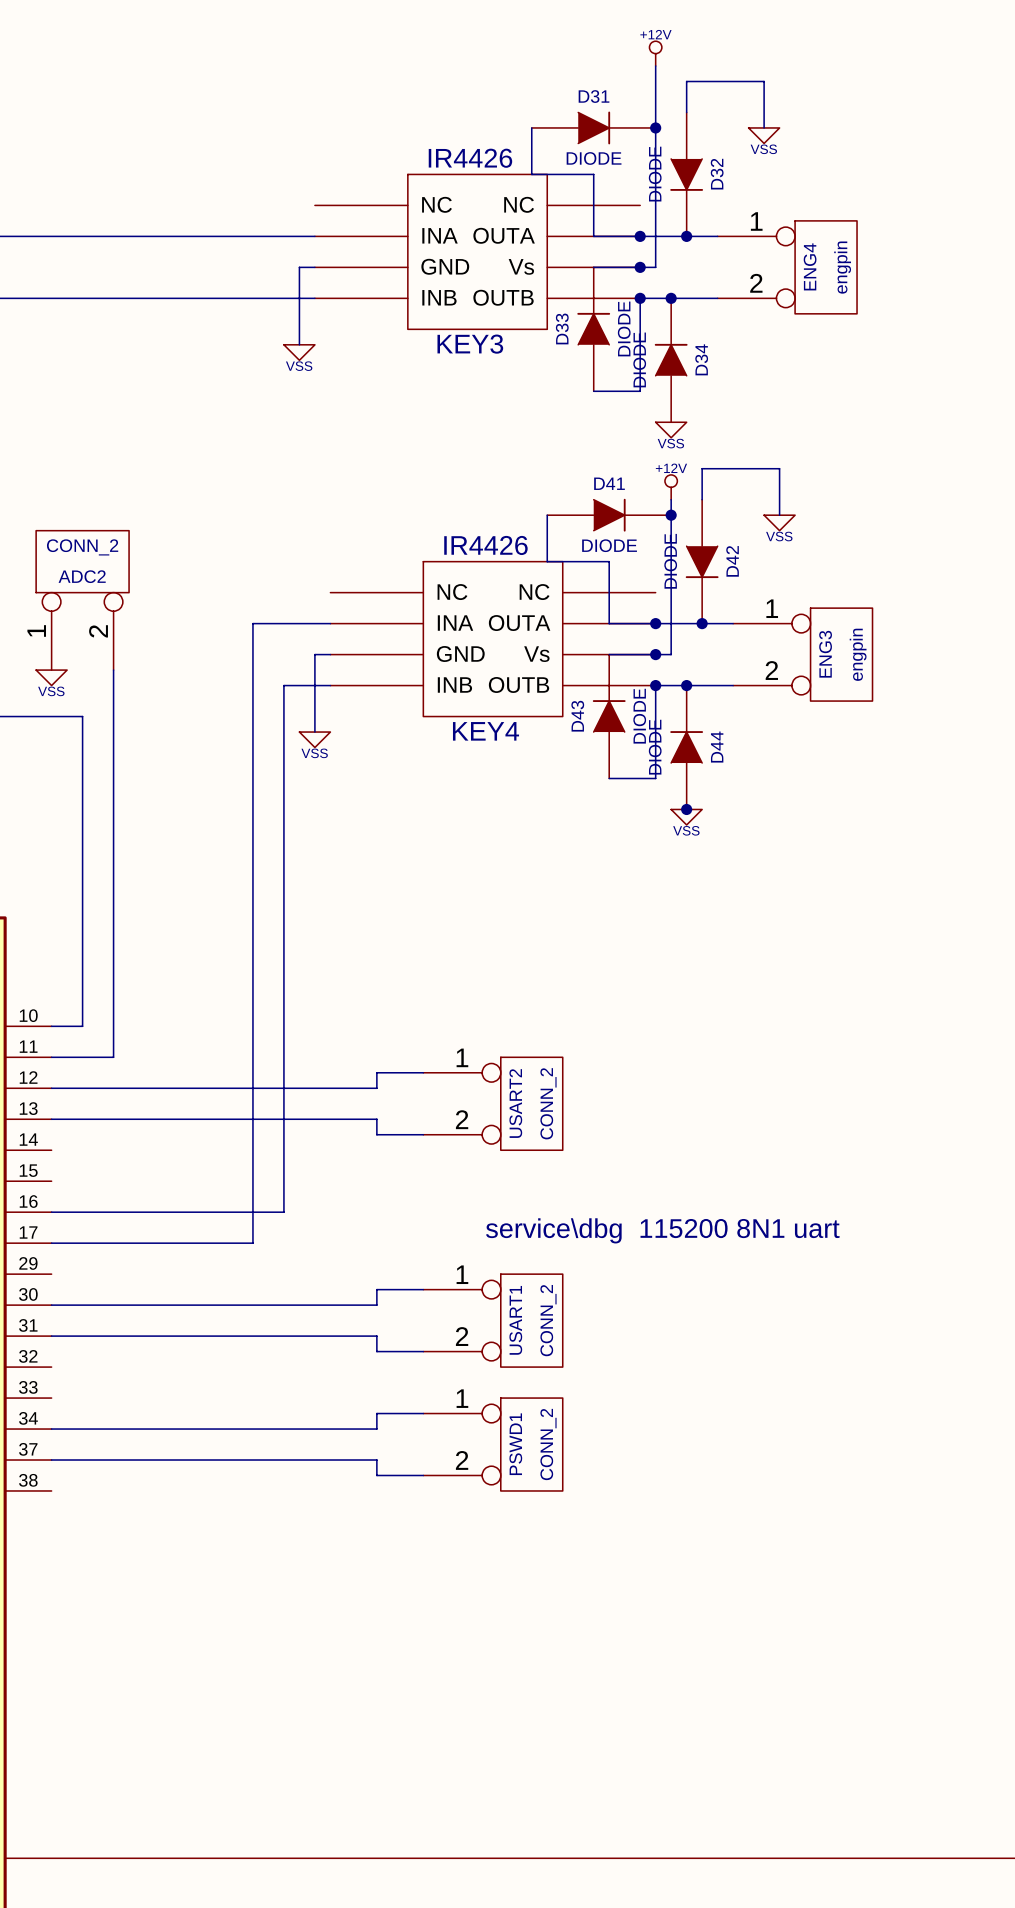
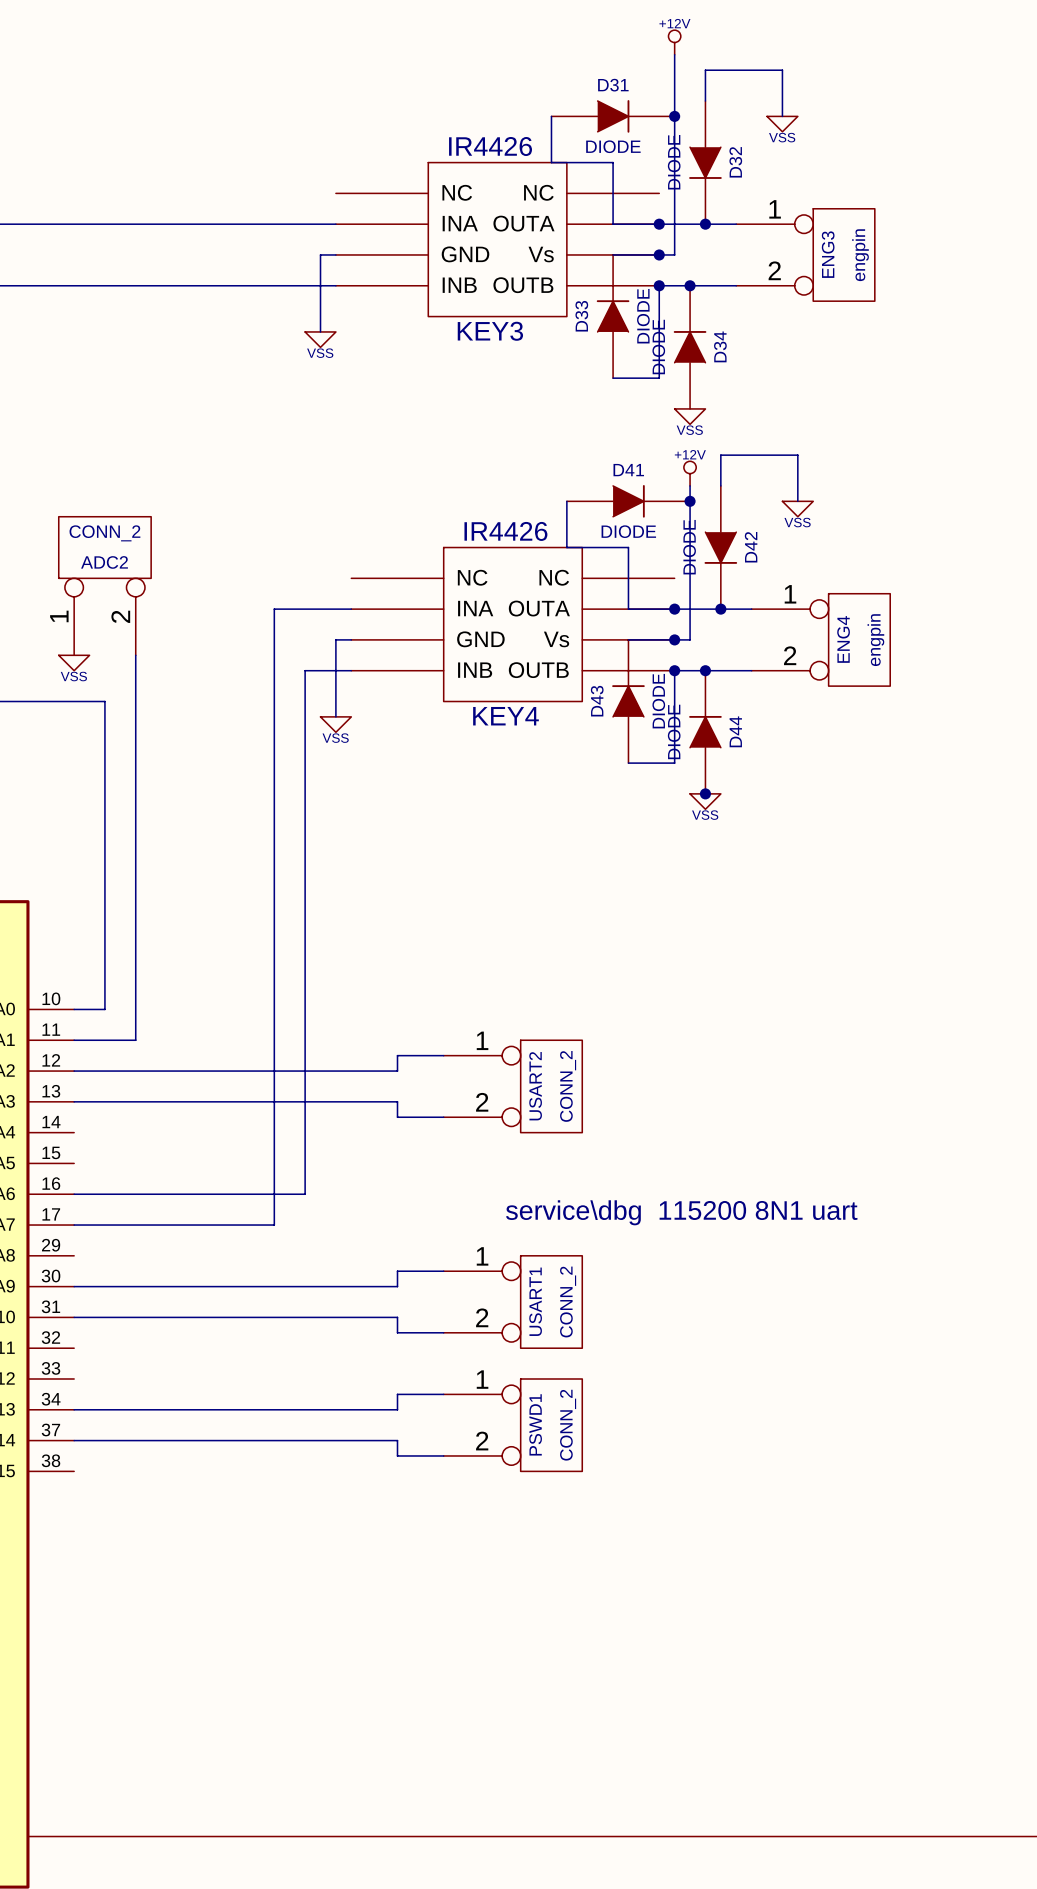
ENG4 name: ENG4 (810, 266) -> ENG3 (828, 254)
ENG3 name: ENG3 (825, 654) -> ENG4 (843, 639)

